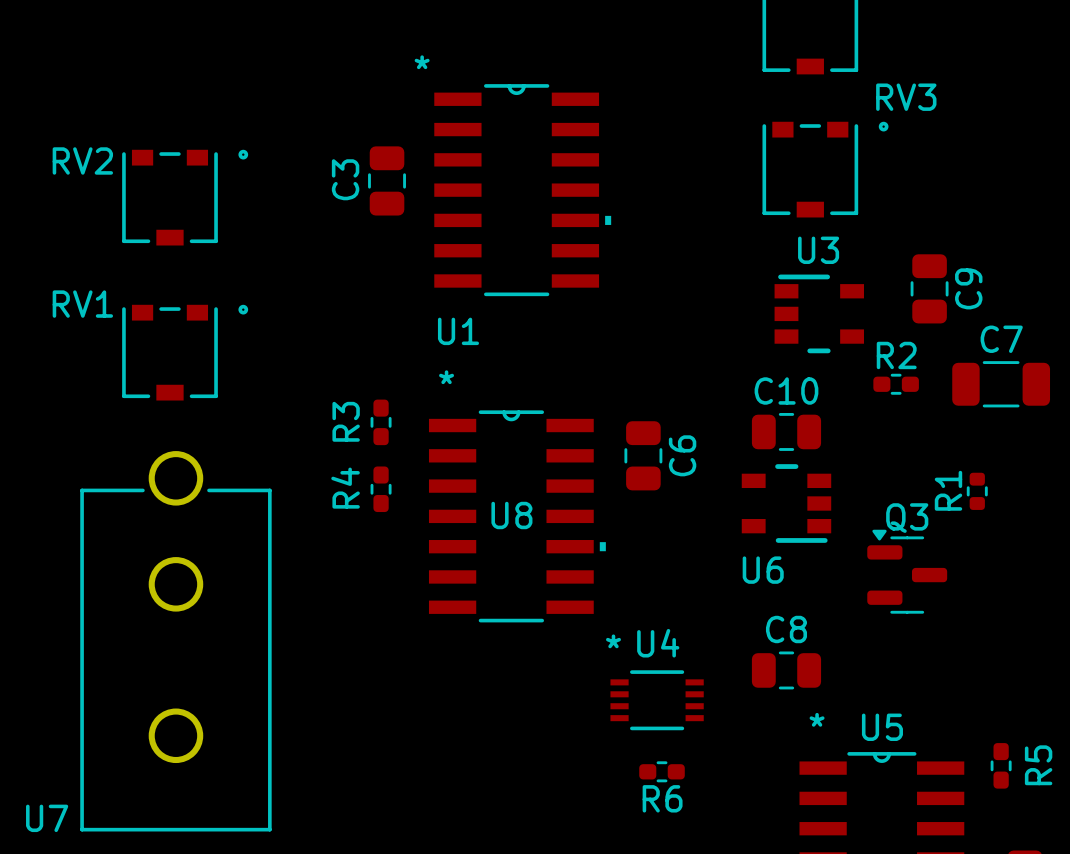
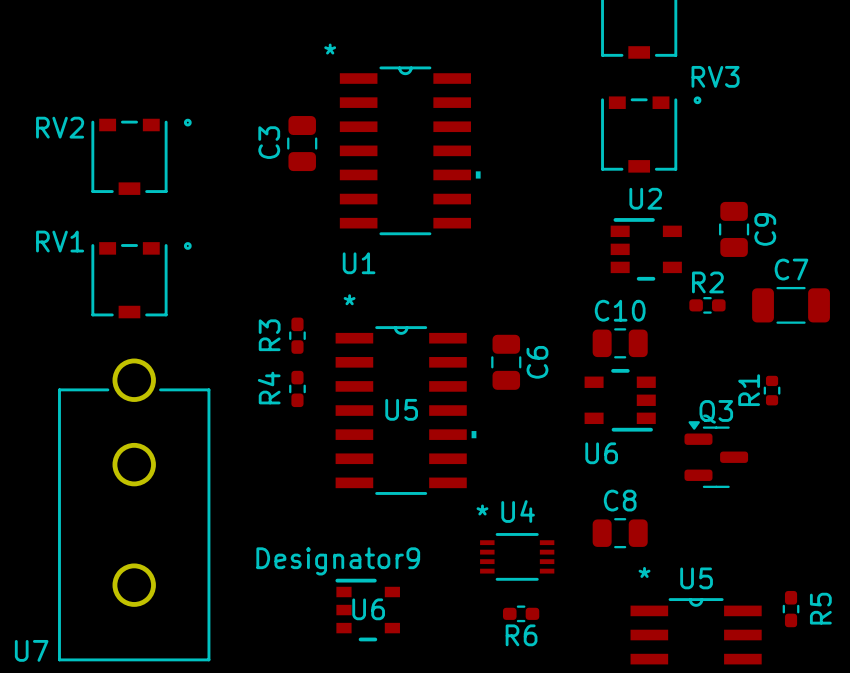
U3 name: U3 (818, 250) -> U2 (645, 198)
U8 name: U8 (511, 515) -> U5 (401, 409)
U6: none -> (367, 610)

